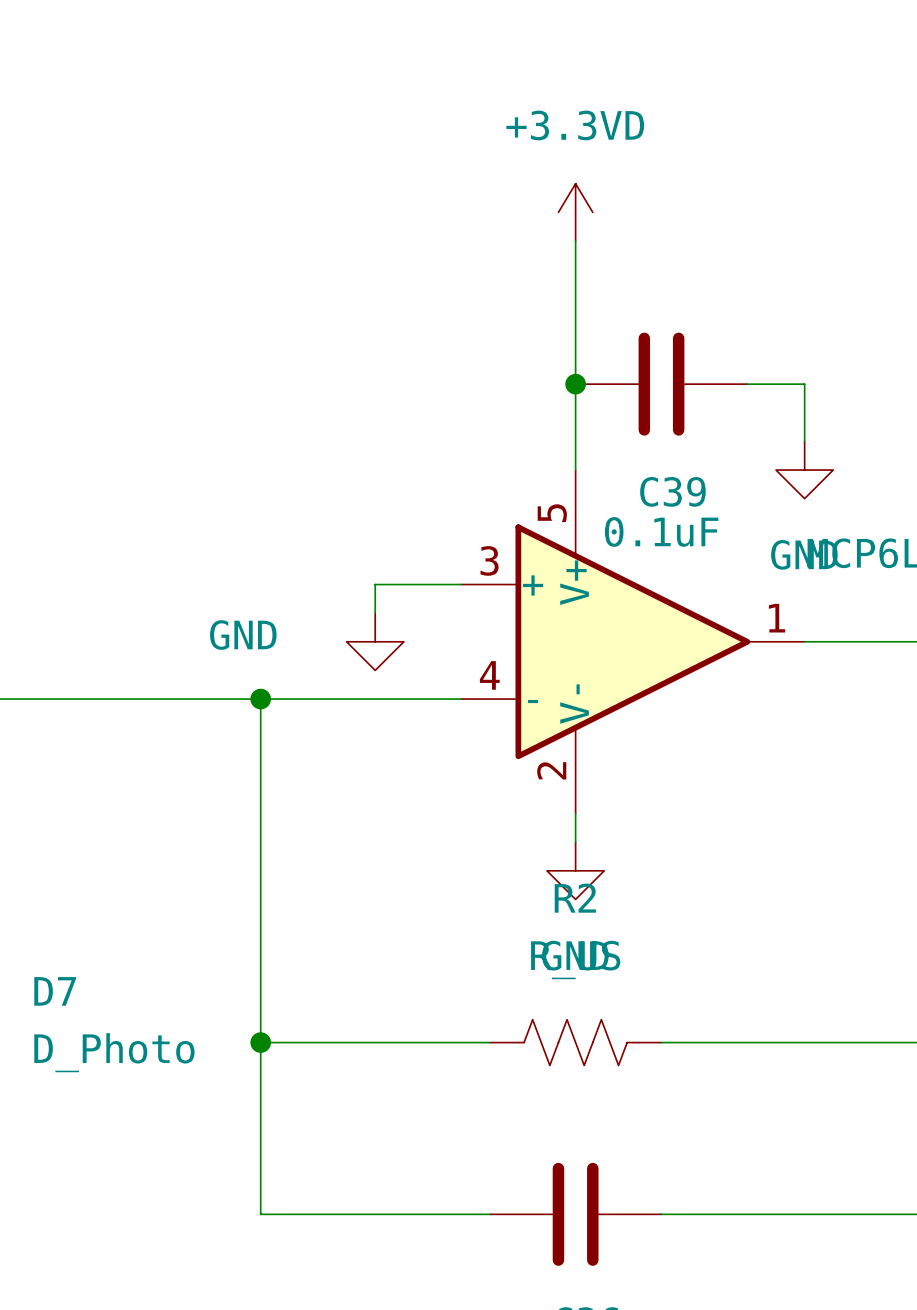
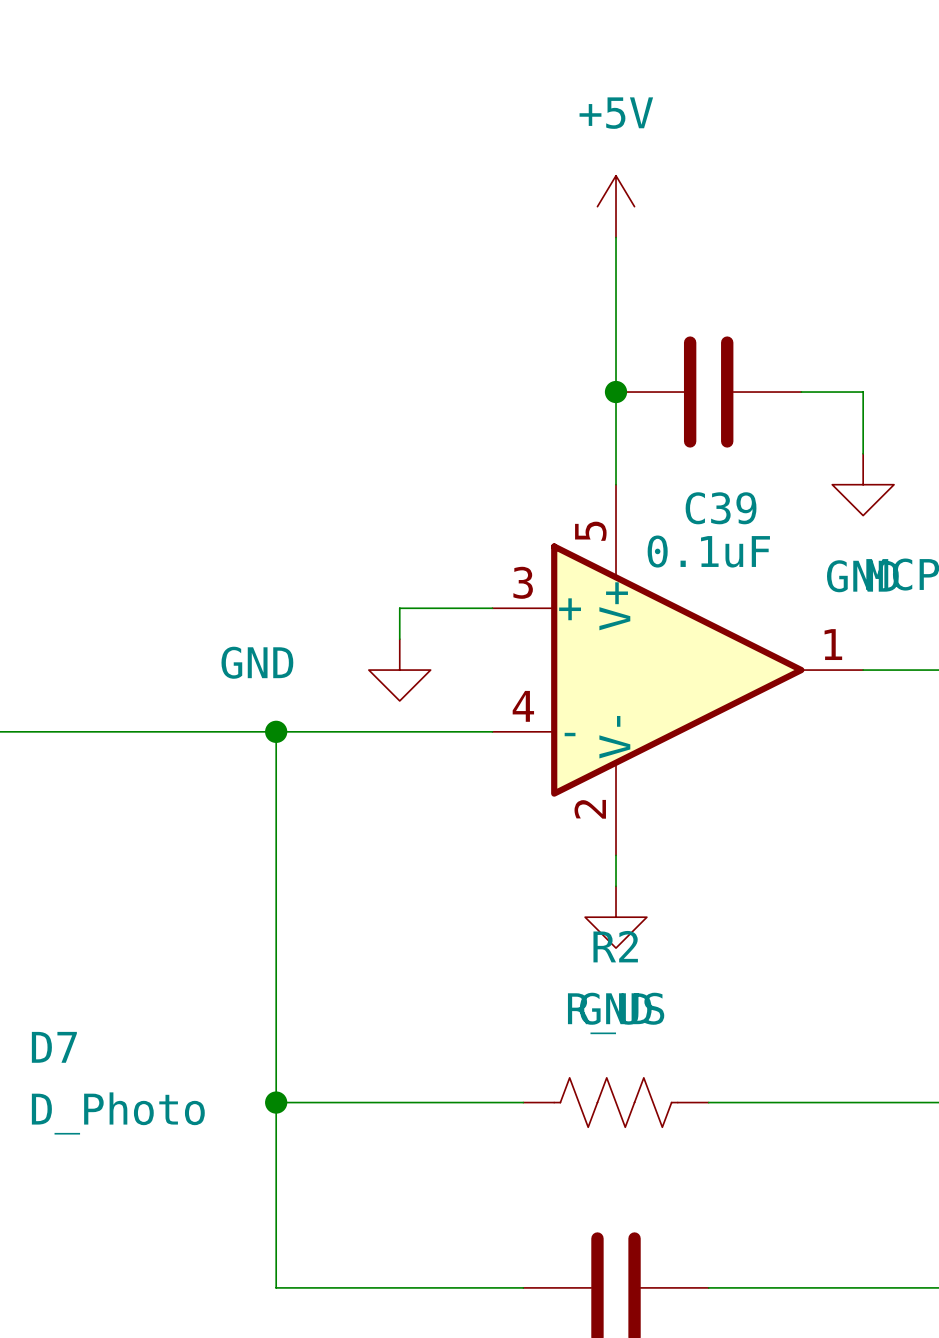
power symbol: +3.3VD (575, 212) -> +5V (616, 206)

